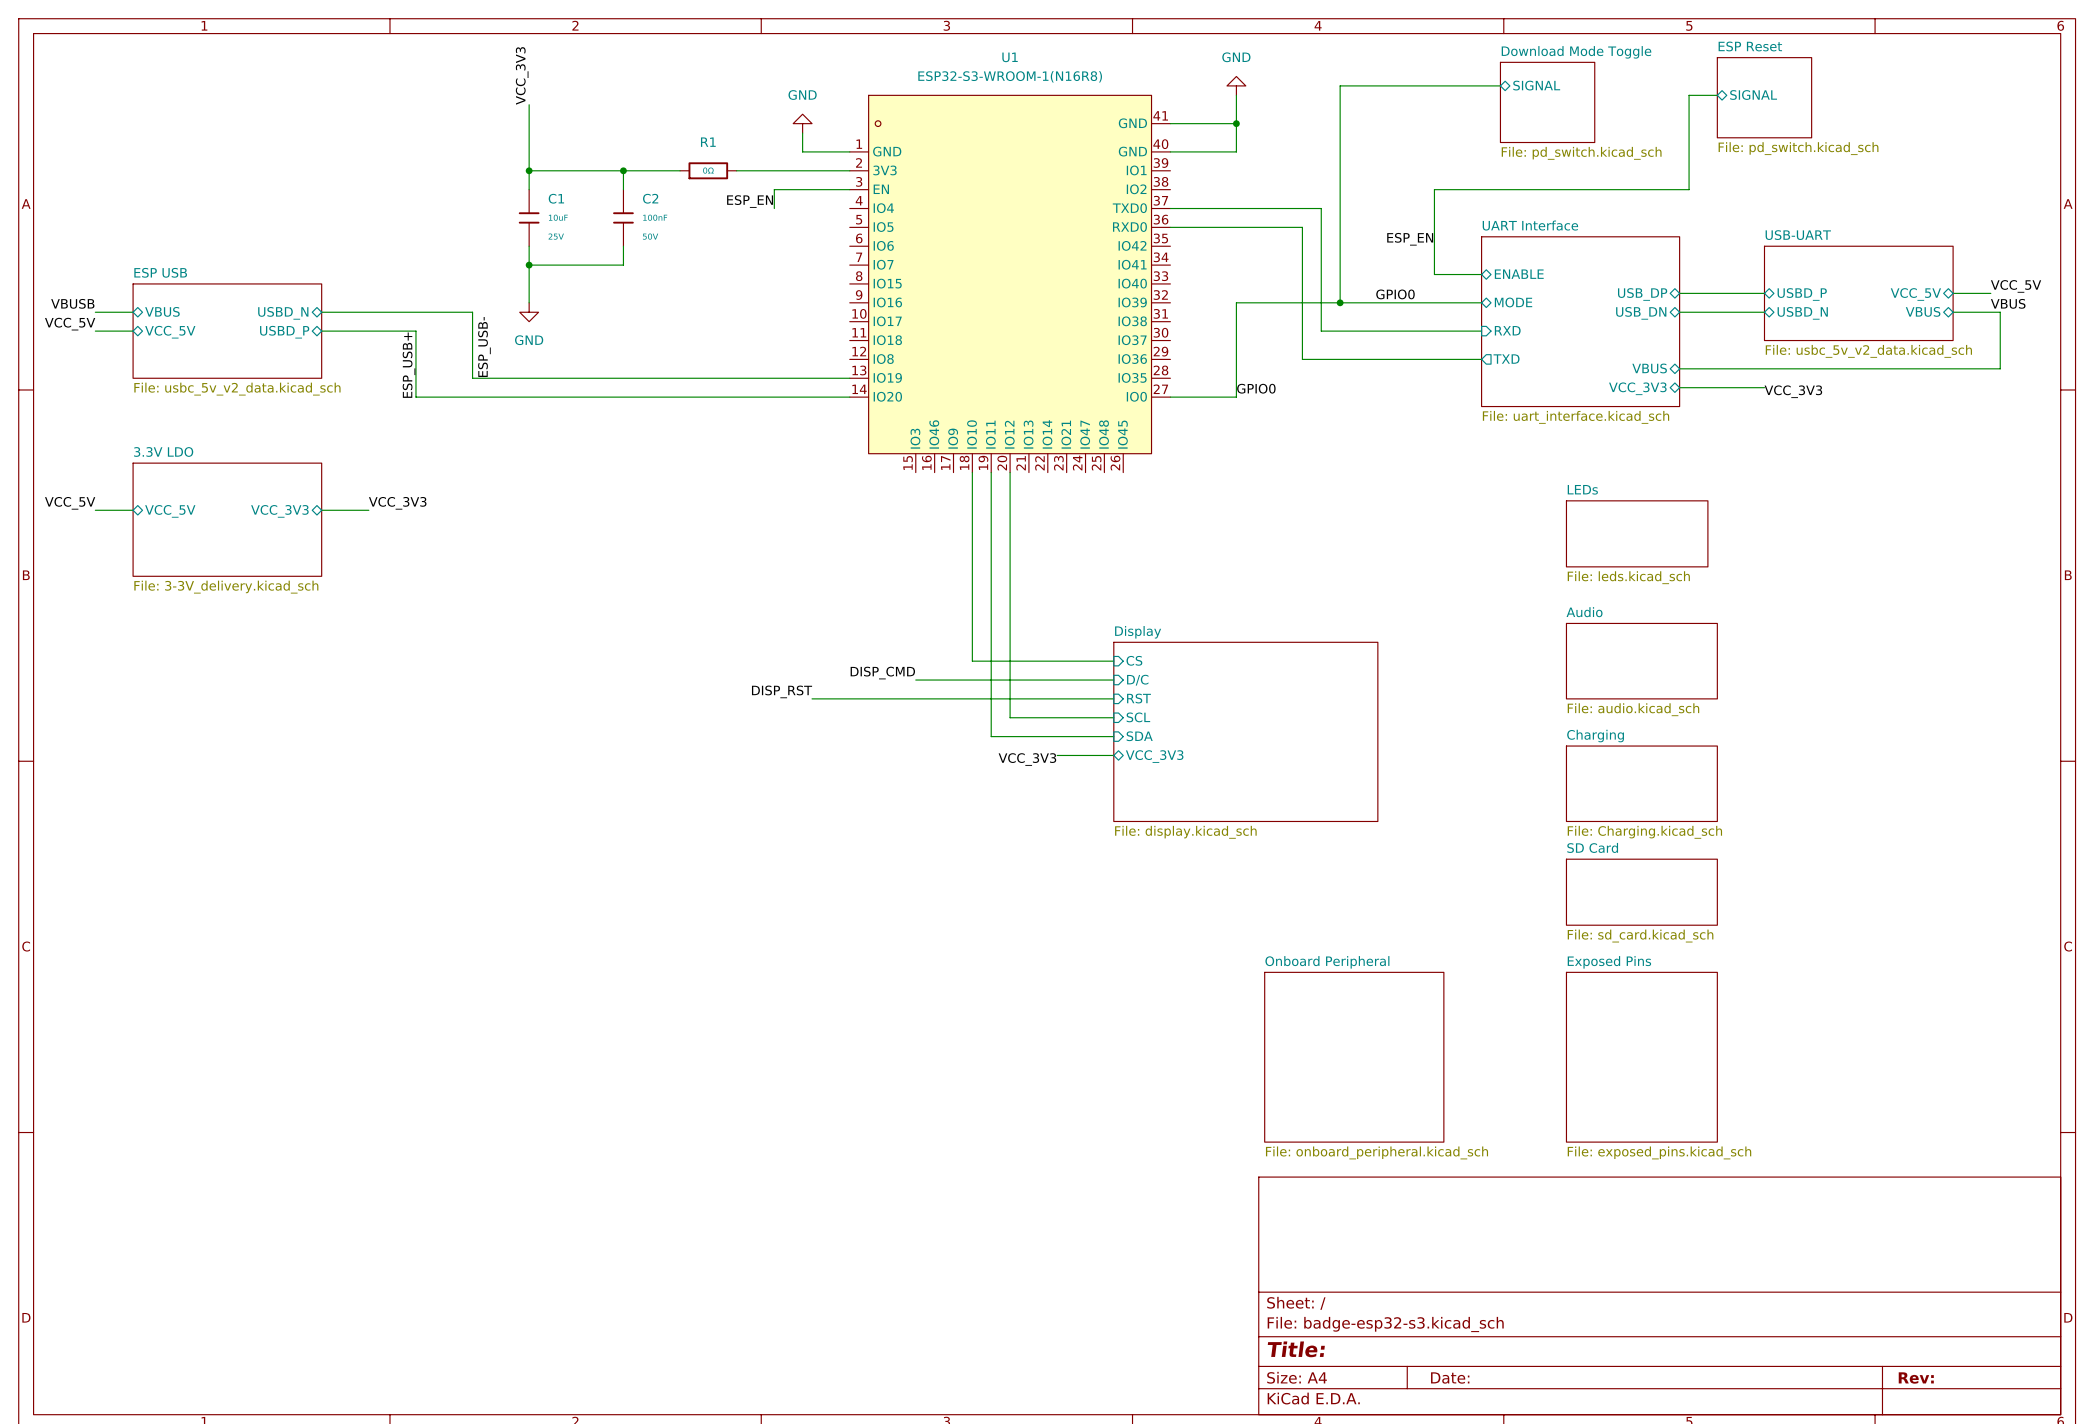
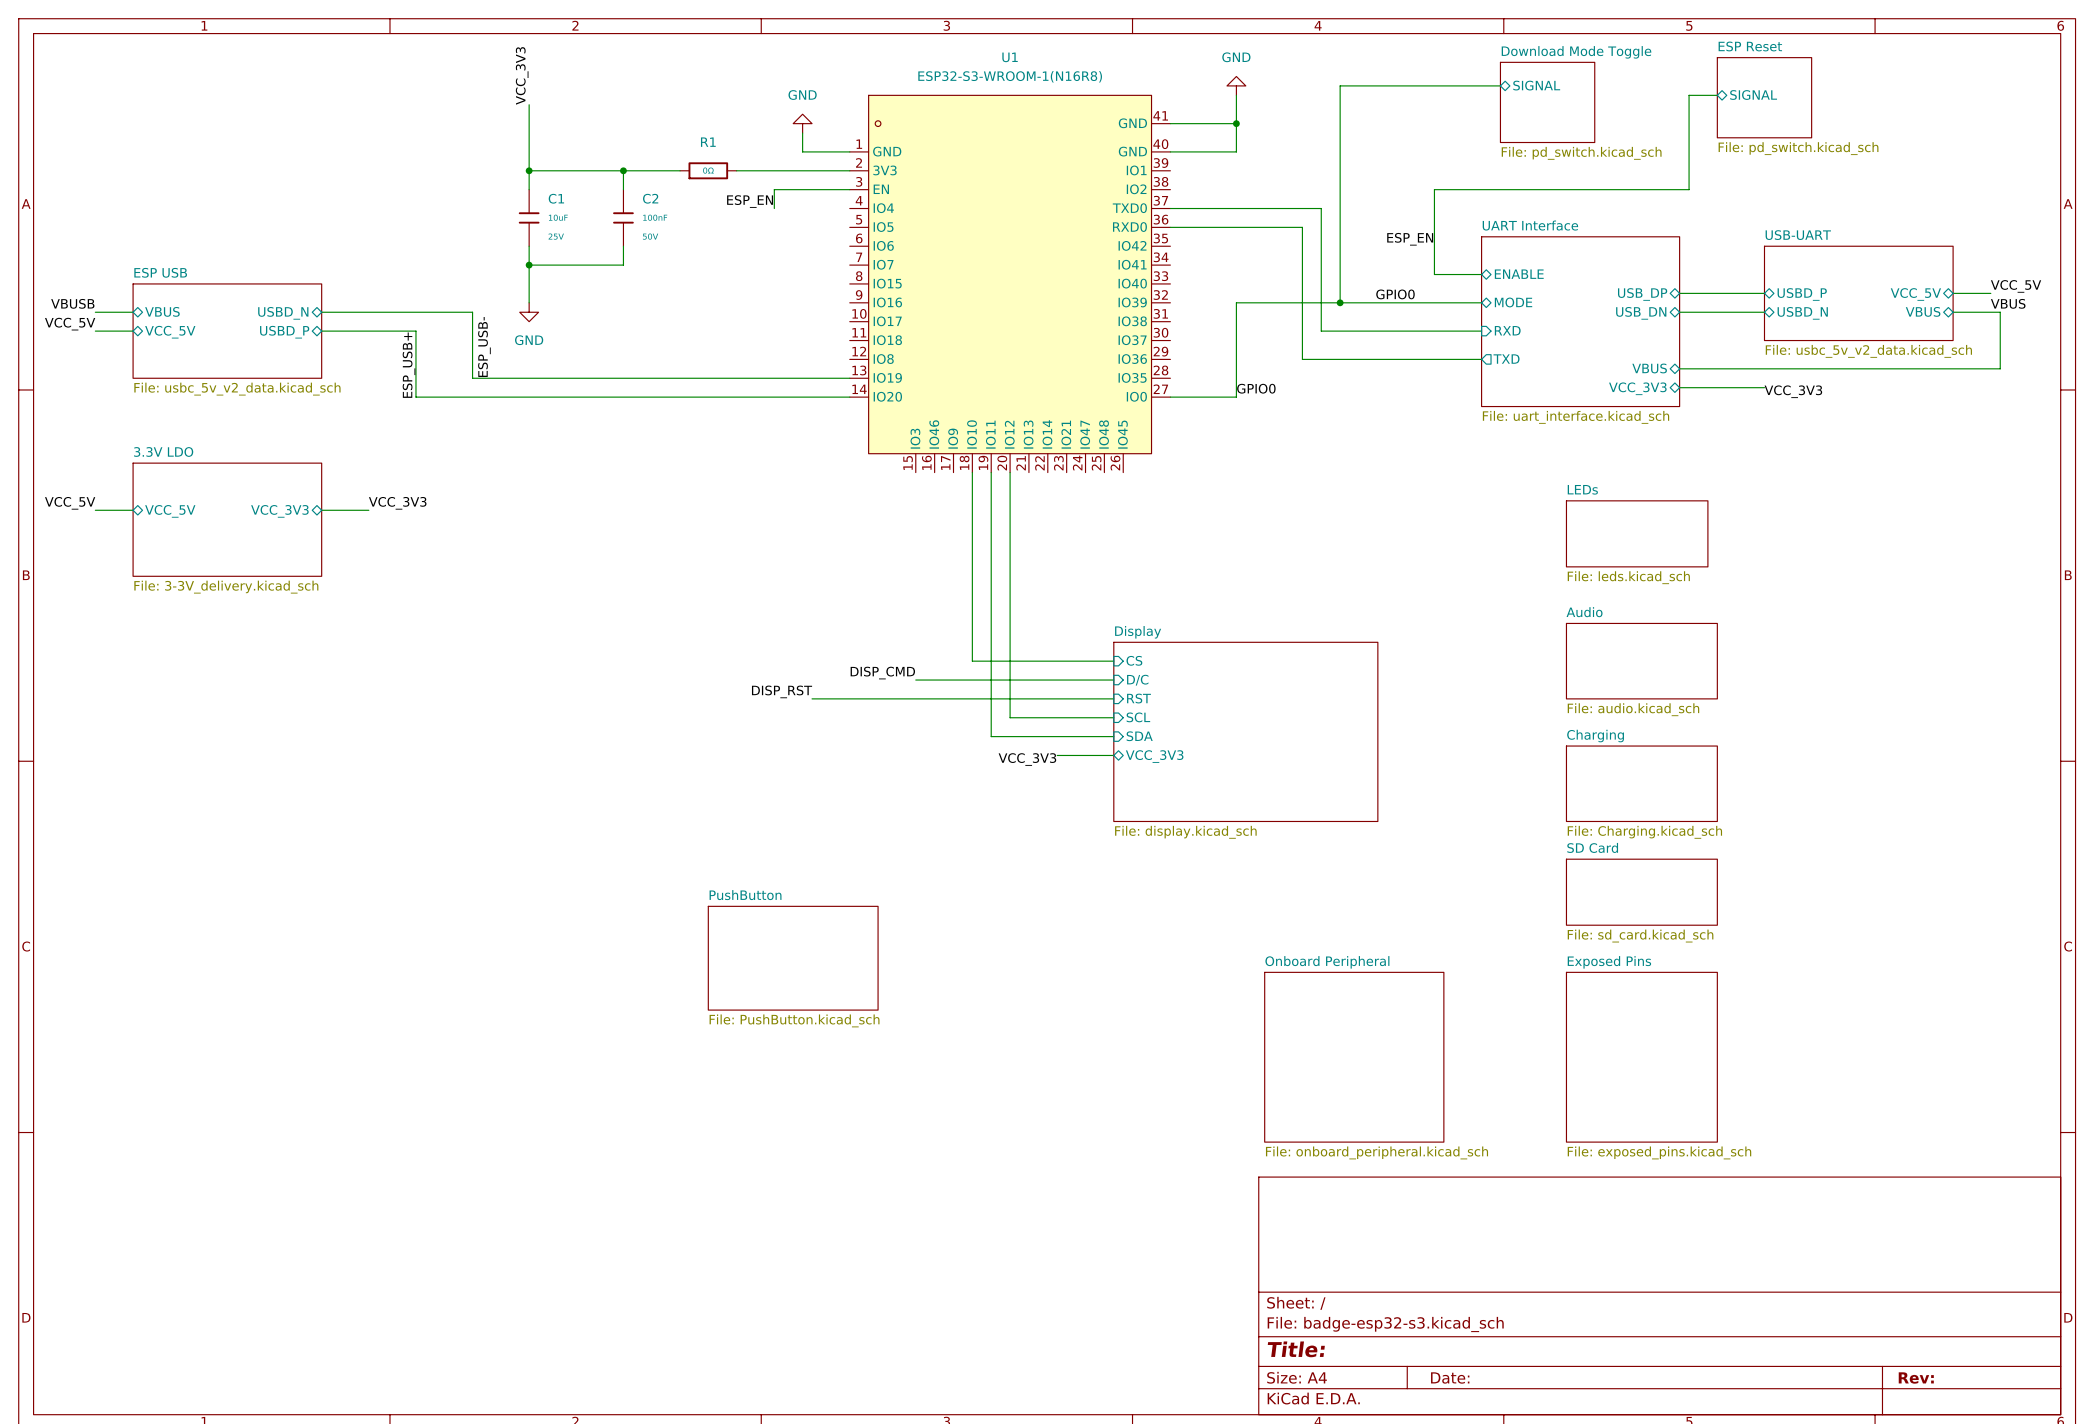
sheet PushButton: none -> File: PushButton.kicad_sch (793, 958)

